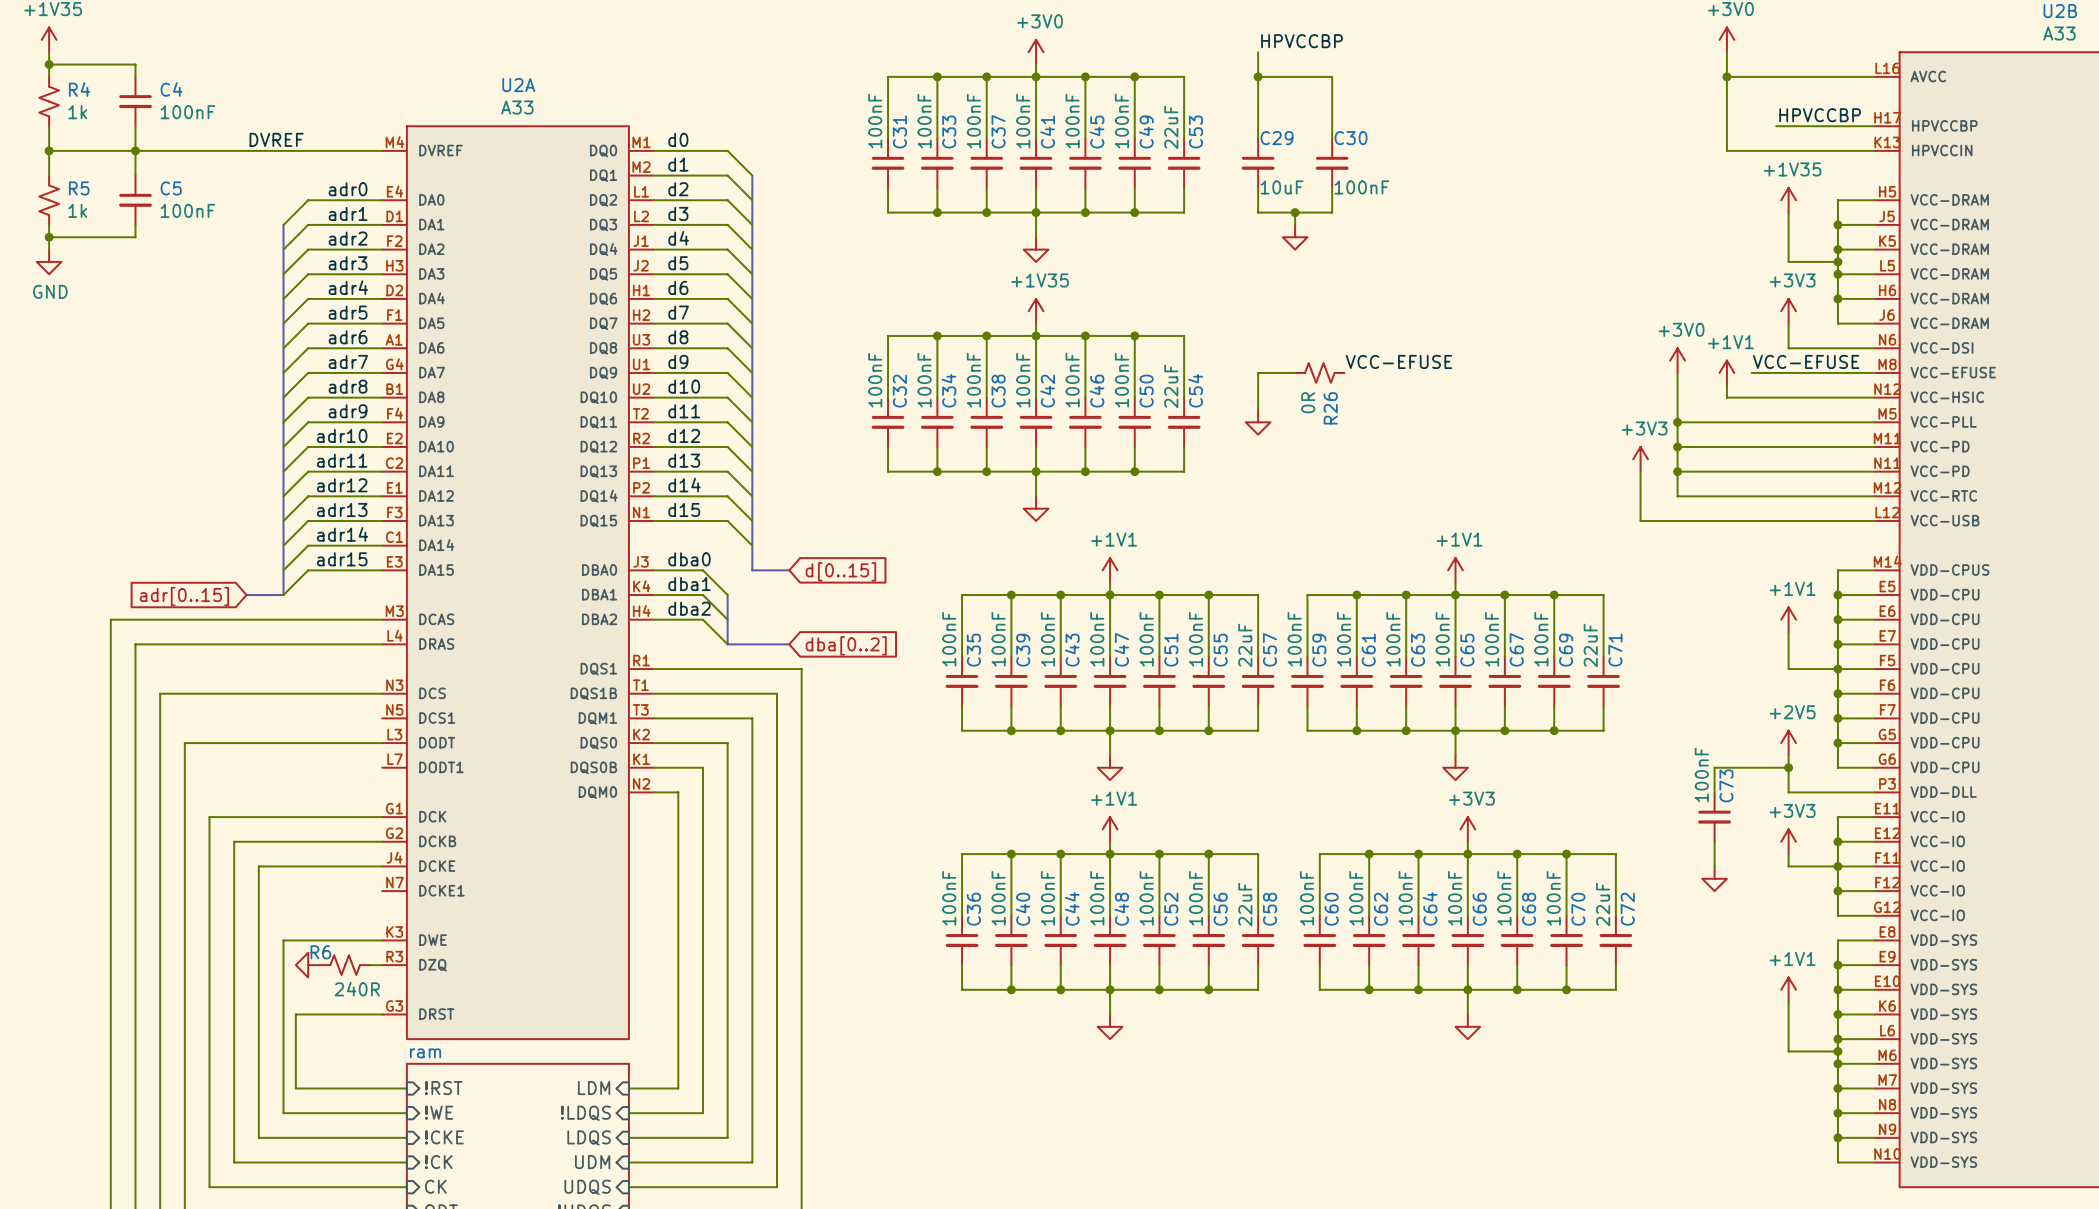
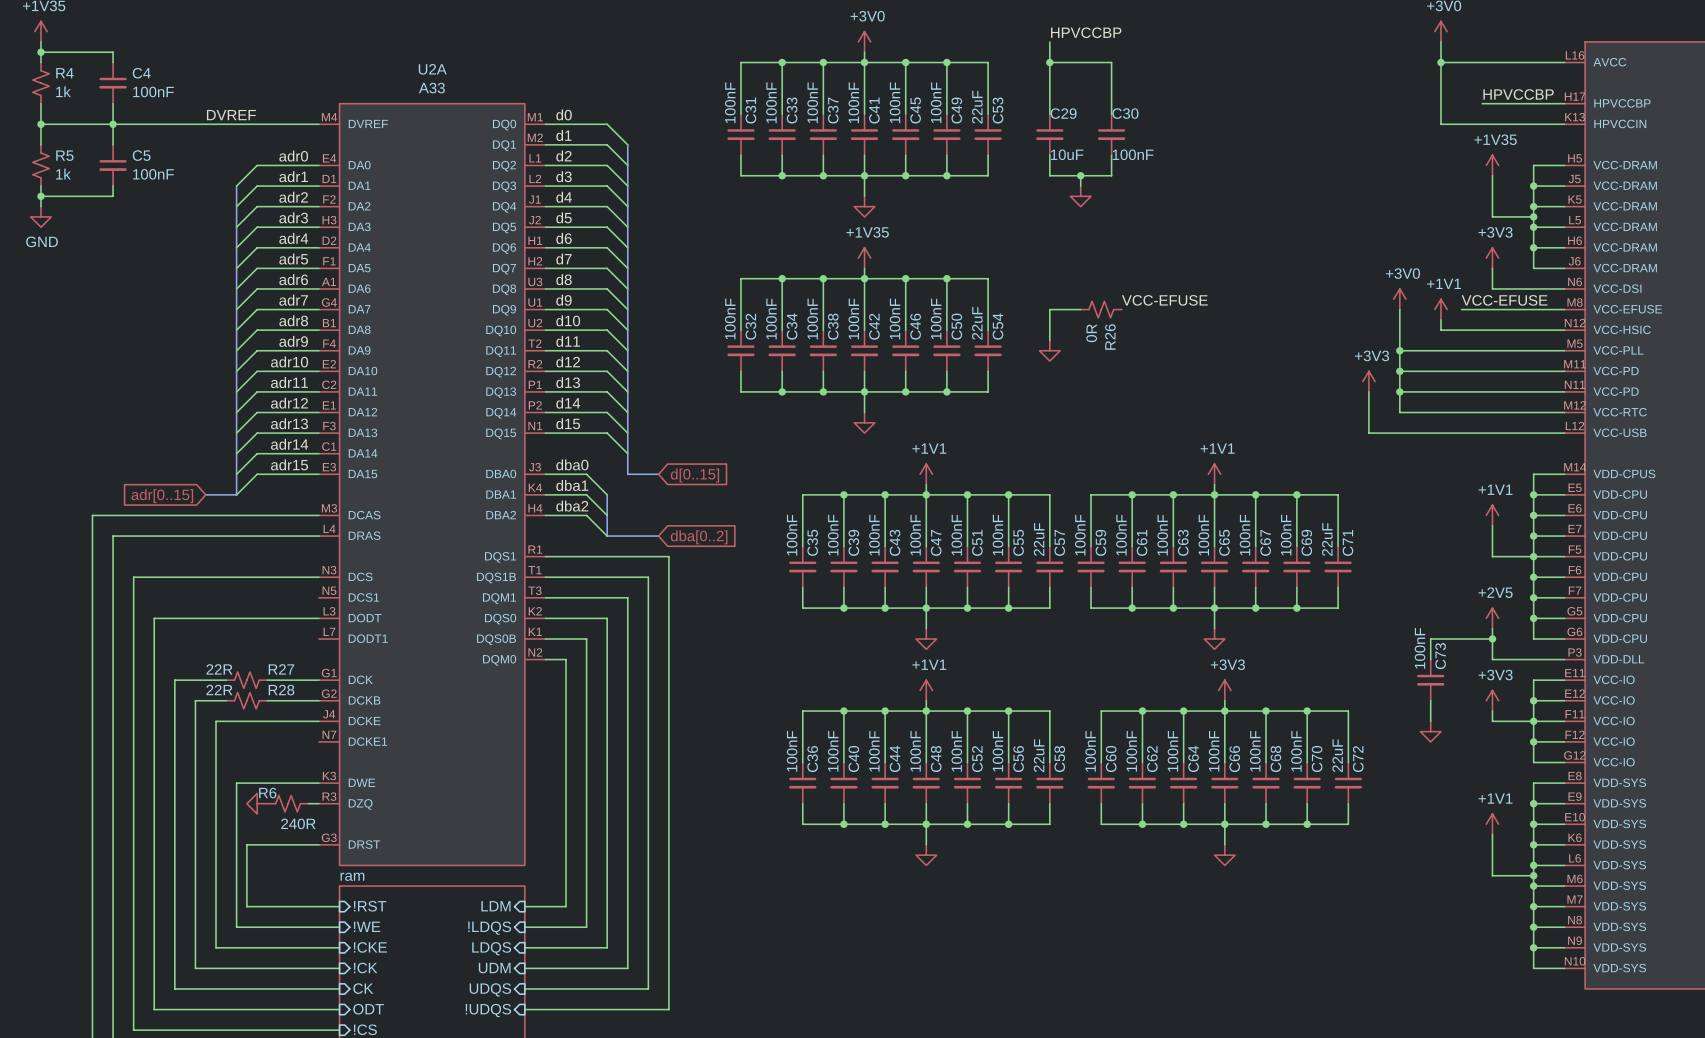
R27: none -> 22R (246, 680)
R28: none -> 22R (246, 700)

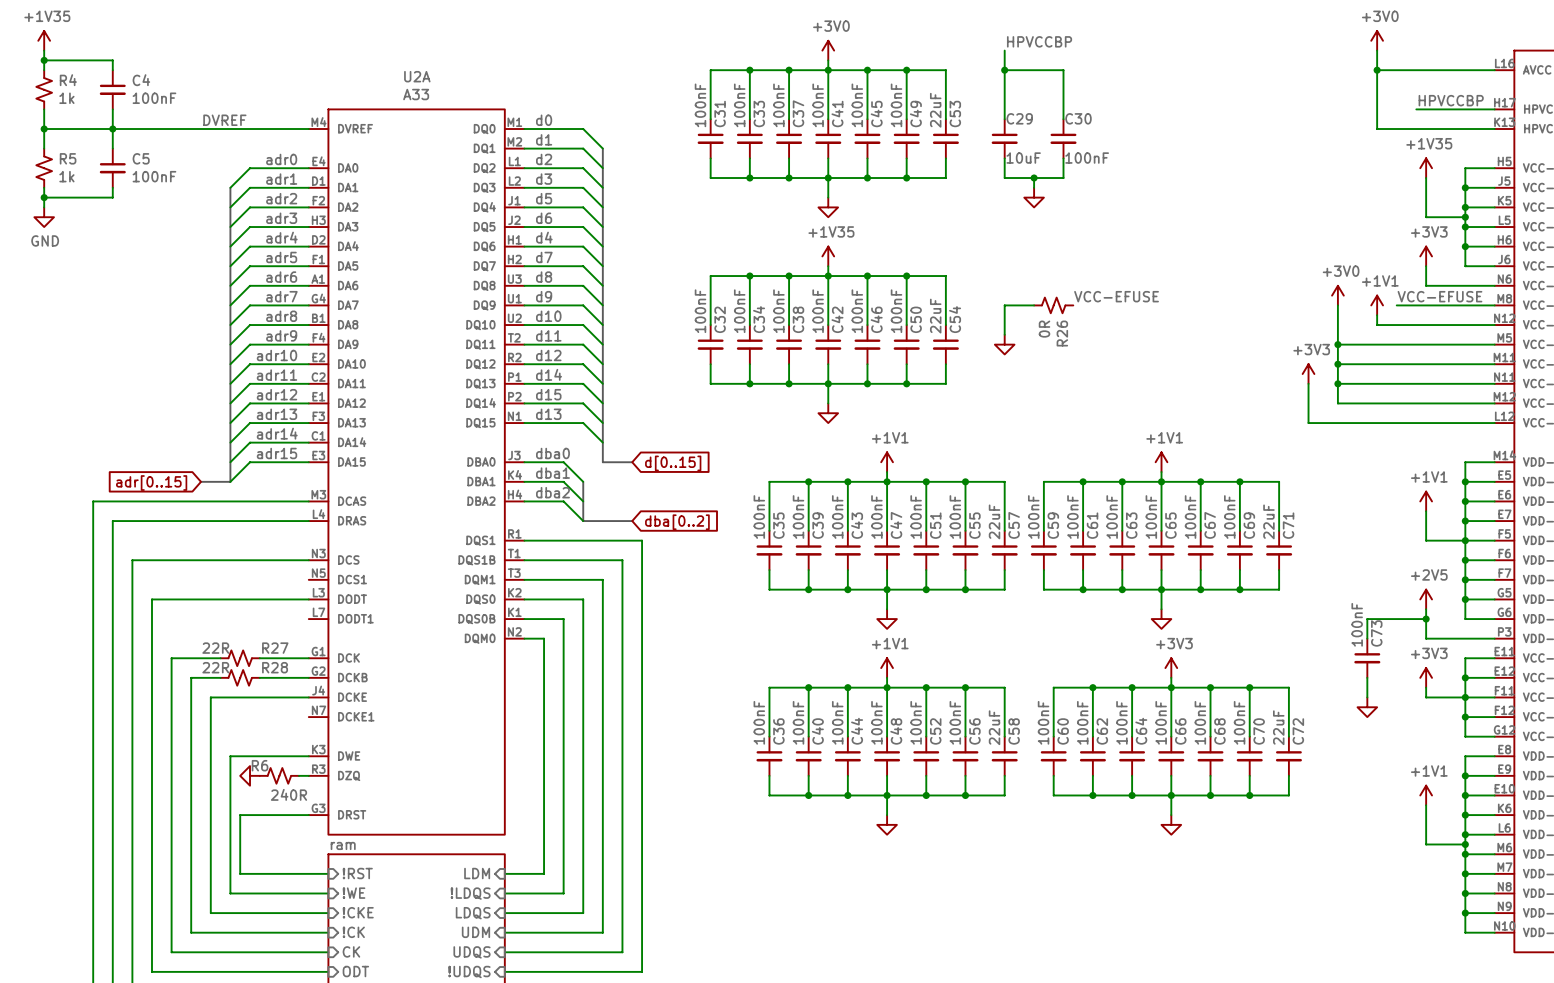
label: d4 (564, 197) -> d5 (544, 198)
label: d5 (564, 217) -> d6 (544, 218)
label: d6 (564, 238) -> d4 (544, 237)
label: d13 (568, 382) -> d14 (549, 374)
label: d14 (568, 403) -> d15 (548, 394)
label: d15 (568, 423) -> d13 (548, 414)

